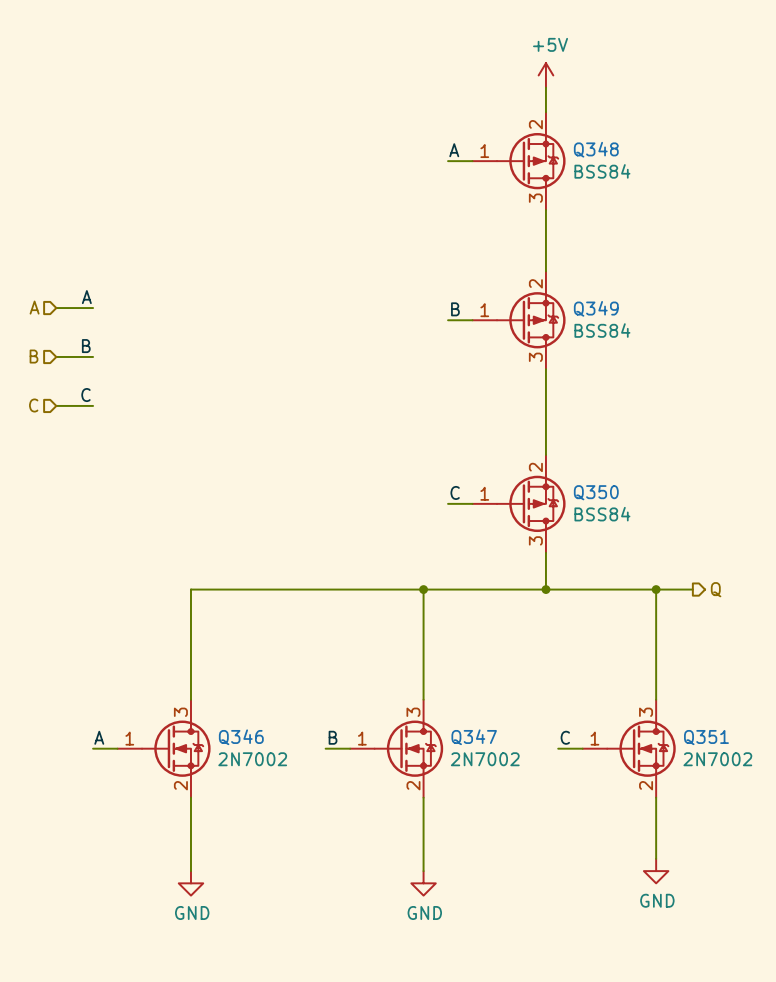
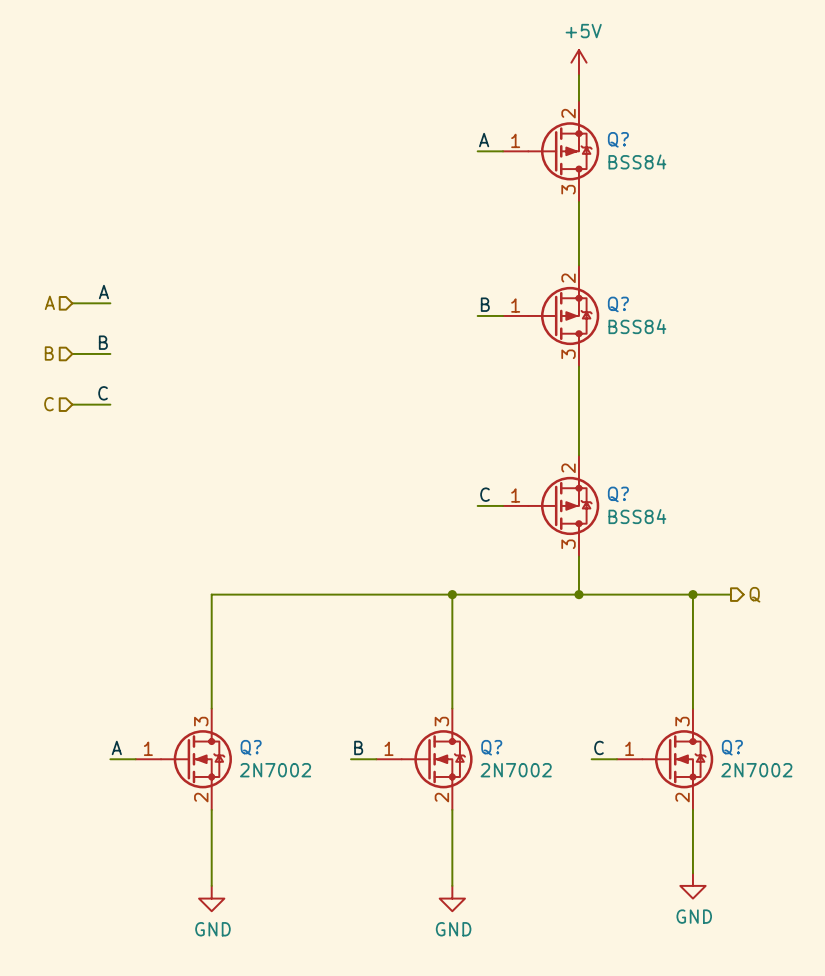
Q348 name: Q348 (596, 149) -> Q? (618, 139)
Q349 name: Q349 (596, 308) -> Q? (618, 304)
Q350 name: Q350 (596, 492) -> Q? (618, 494)
Q346 name: Q346 (241, 737) -> Q? (251, 747)
Q347 name: Q347 (474, 737) -> Q? (491, 747)
Q351 name: Q351 (706, 737) -> Q? (732, 747)

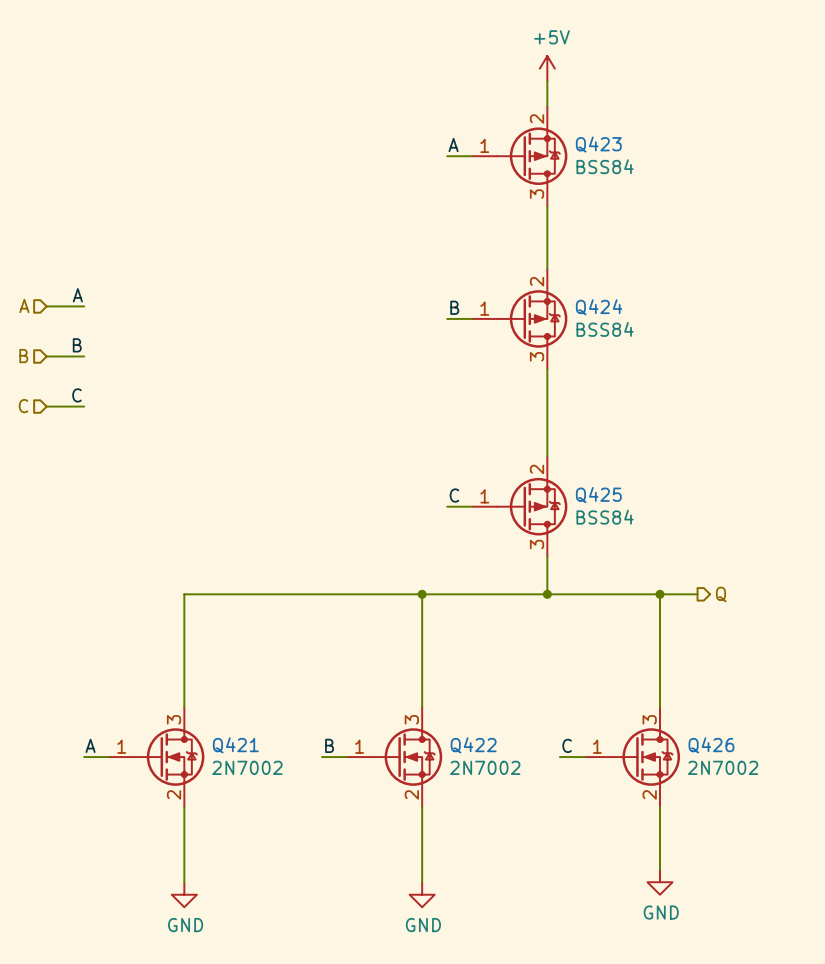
Q? name: Q? (618, 139) -> Q423 (598, 144)
Q? name: Q? (618, 304) -> Q424 (599, 307)
Q? name: Q? (618, 494) -> Q425 (598, 495)
Q? name: Q? (251, 747) -> Q421 (235, 745)
Q? name: Q? (491, 747) -> Q422 (473, 745)
Q? name: Q? (732, 747) -> Q426 (711, 745)

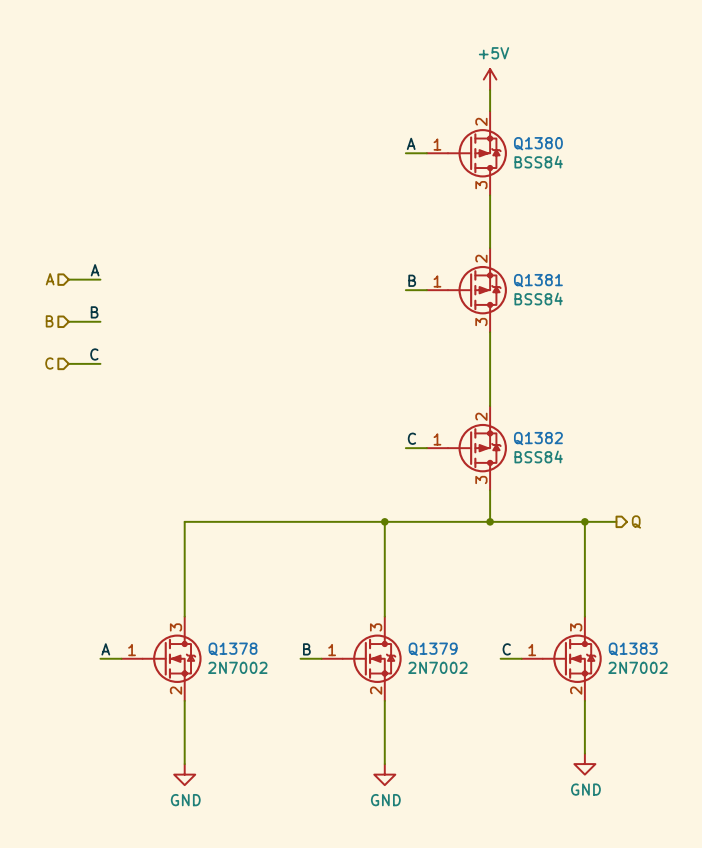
Q423 name: Q423 (598, 144) -> Q1380 (538, 143)
Q424 name: Q424 (599, 307) -> Q1381 (538, 280)
Q425 name: Q425 (598, 495) -> Q1382 (538, 438)
Q421 name: Q421 (235, 745) -> Q1378 (233, 649)
Q422 name: Q422 (473, 745) -> Q1379 (433, 649)
Q426 name: Q426 (711, 745) -> Q1383 (633, 649)

